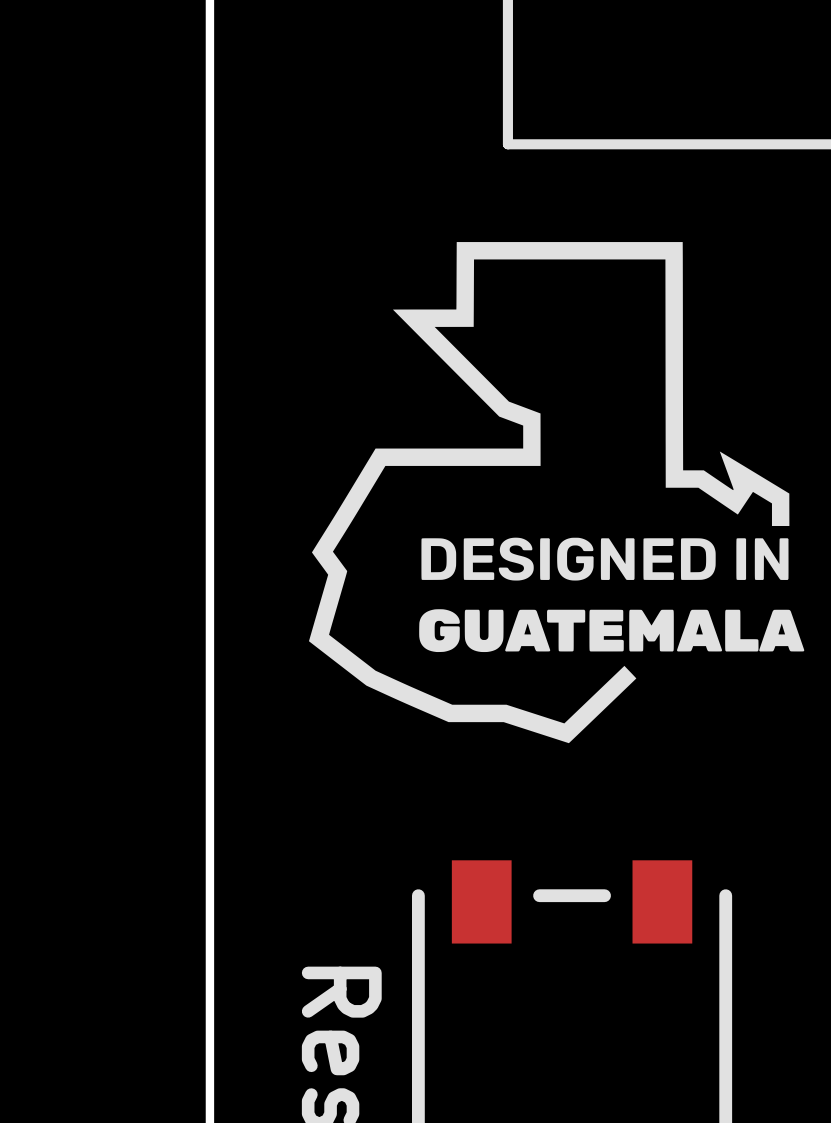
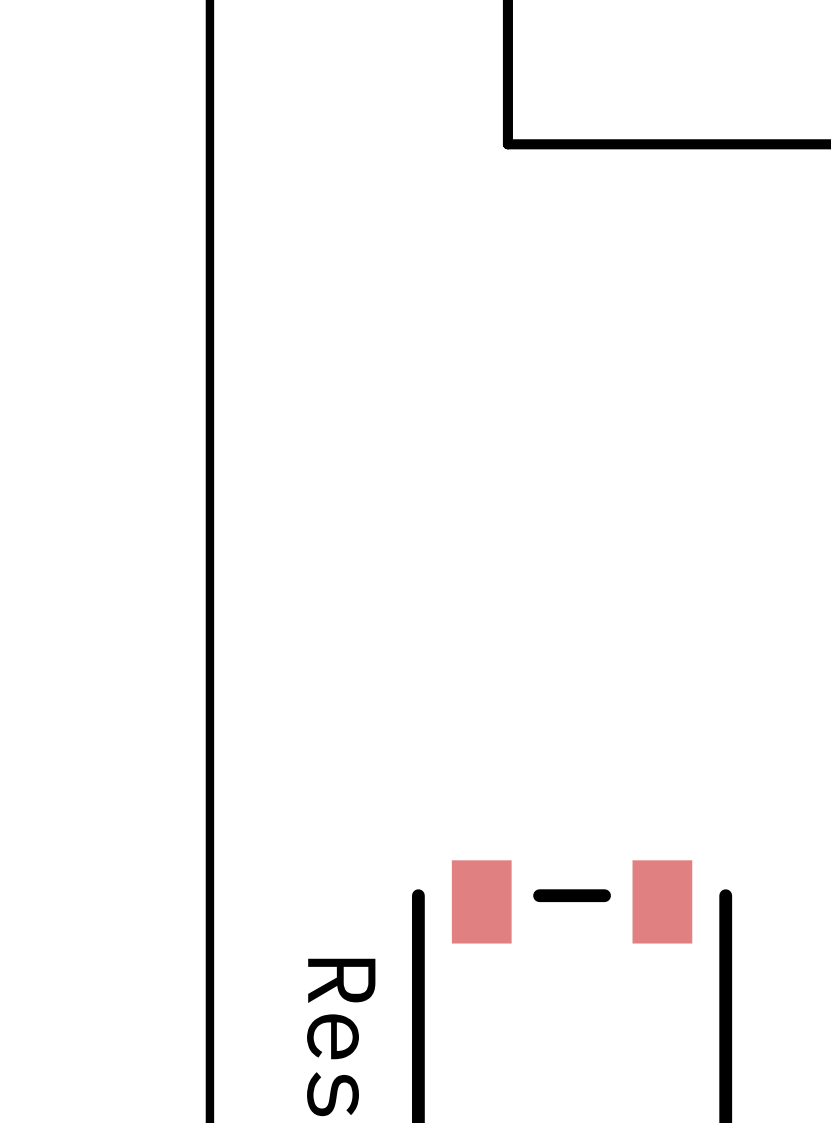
drawing: [308, 242, 805, 744] -> none

